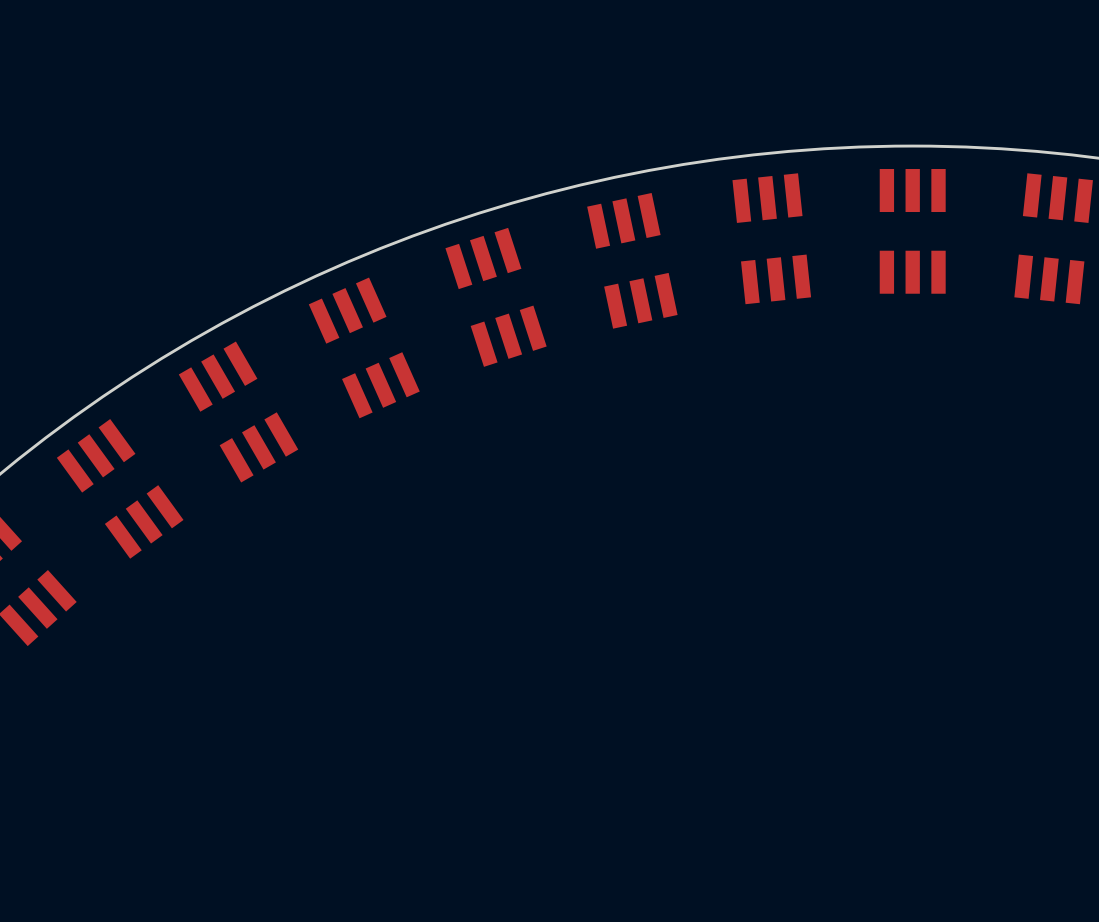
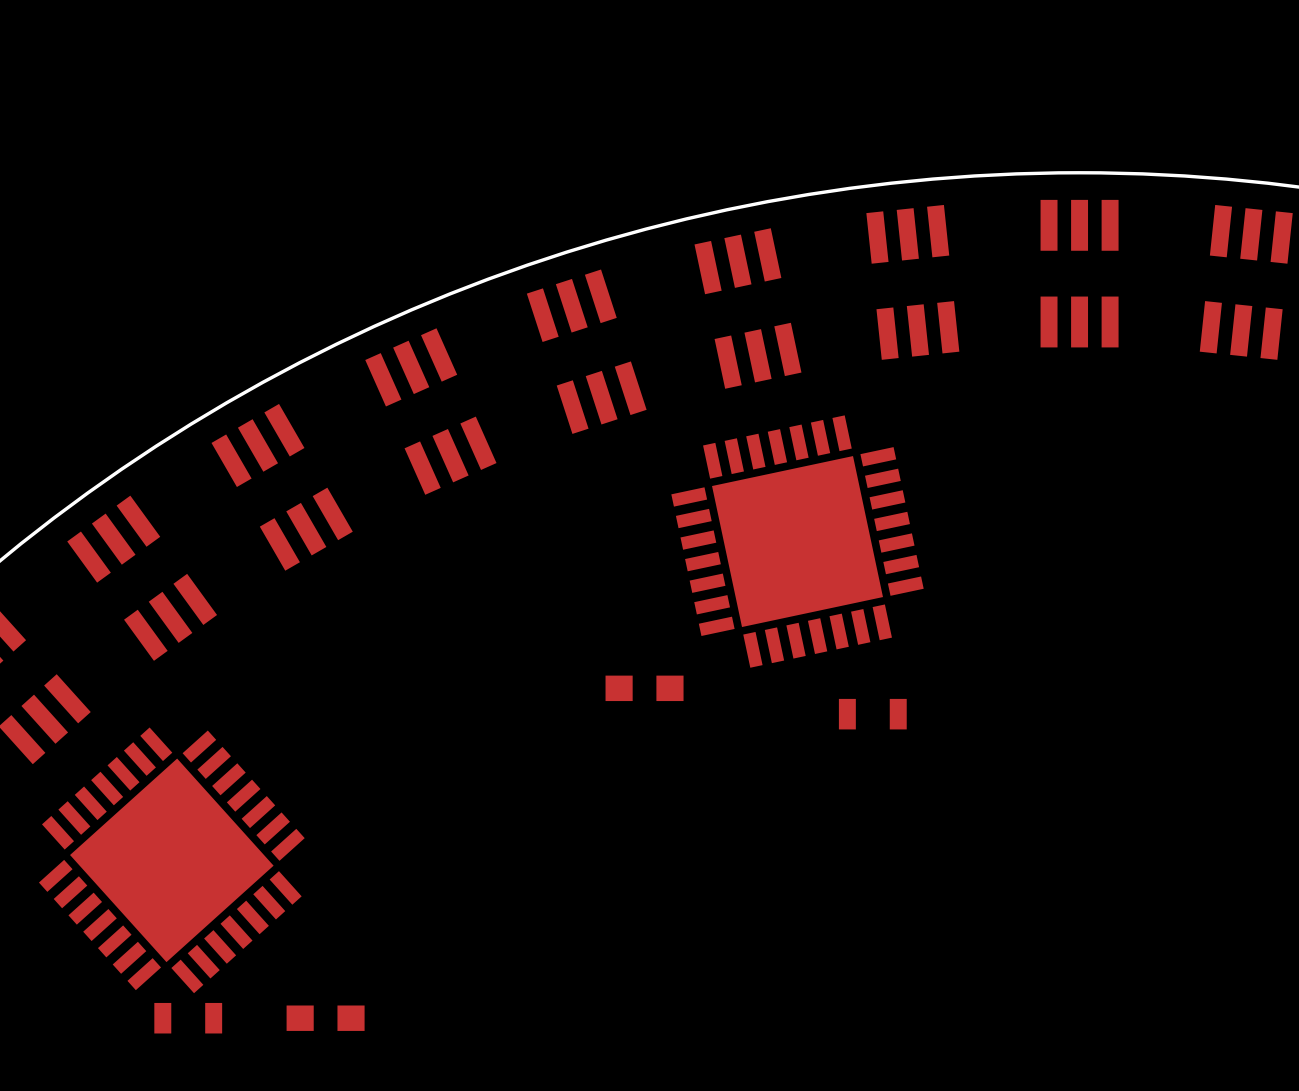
part: none -> (797, 541)
part: none -> (644, 688)
part: none -> (872, 714)
part: none -> (171, 860)
part: none -> (188, 1018)
part: none -> (325, 1018)

